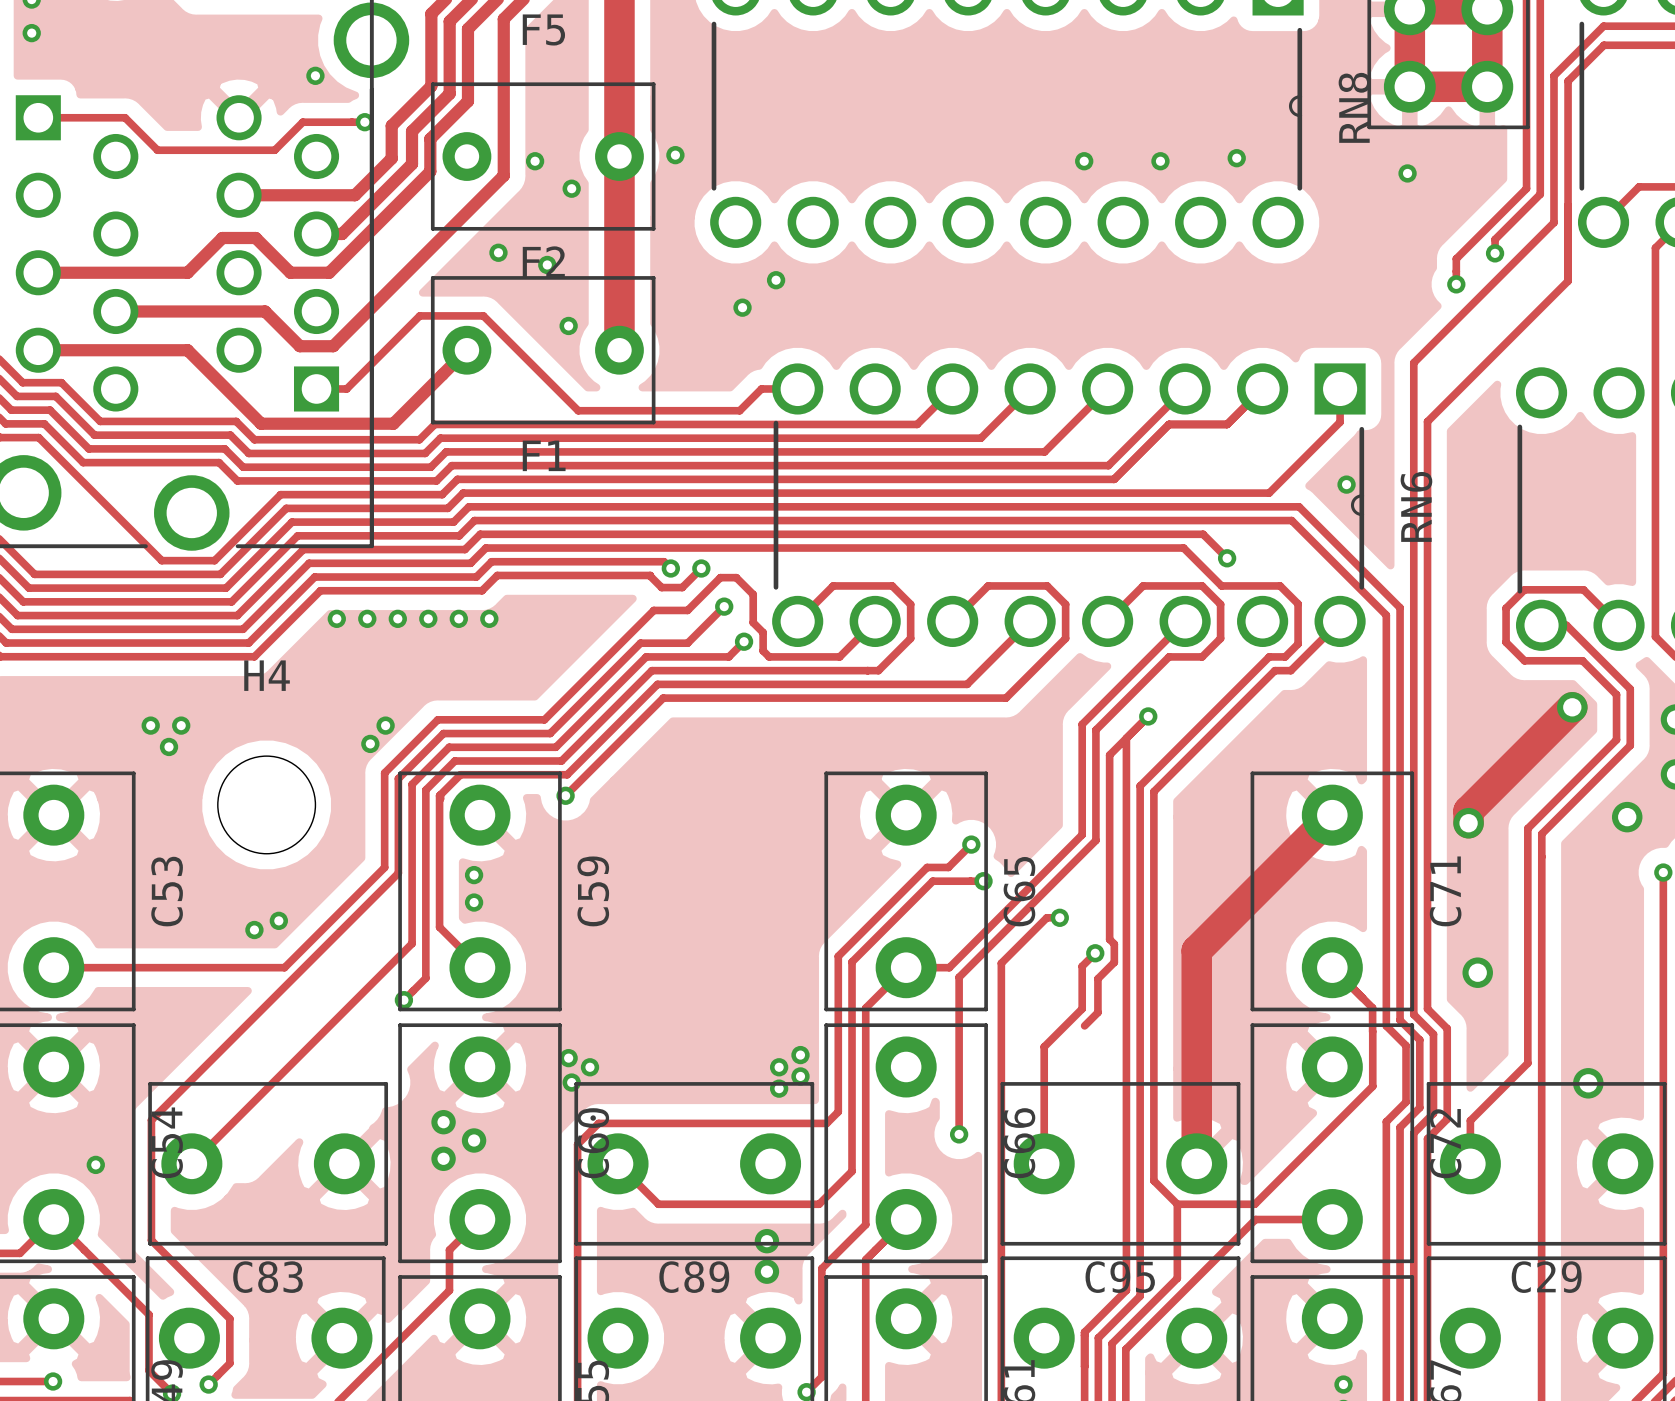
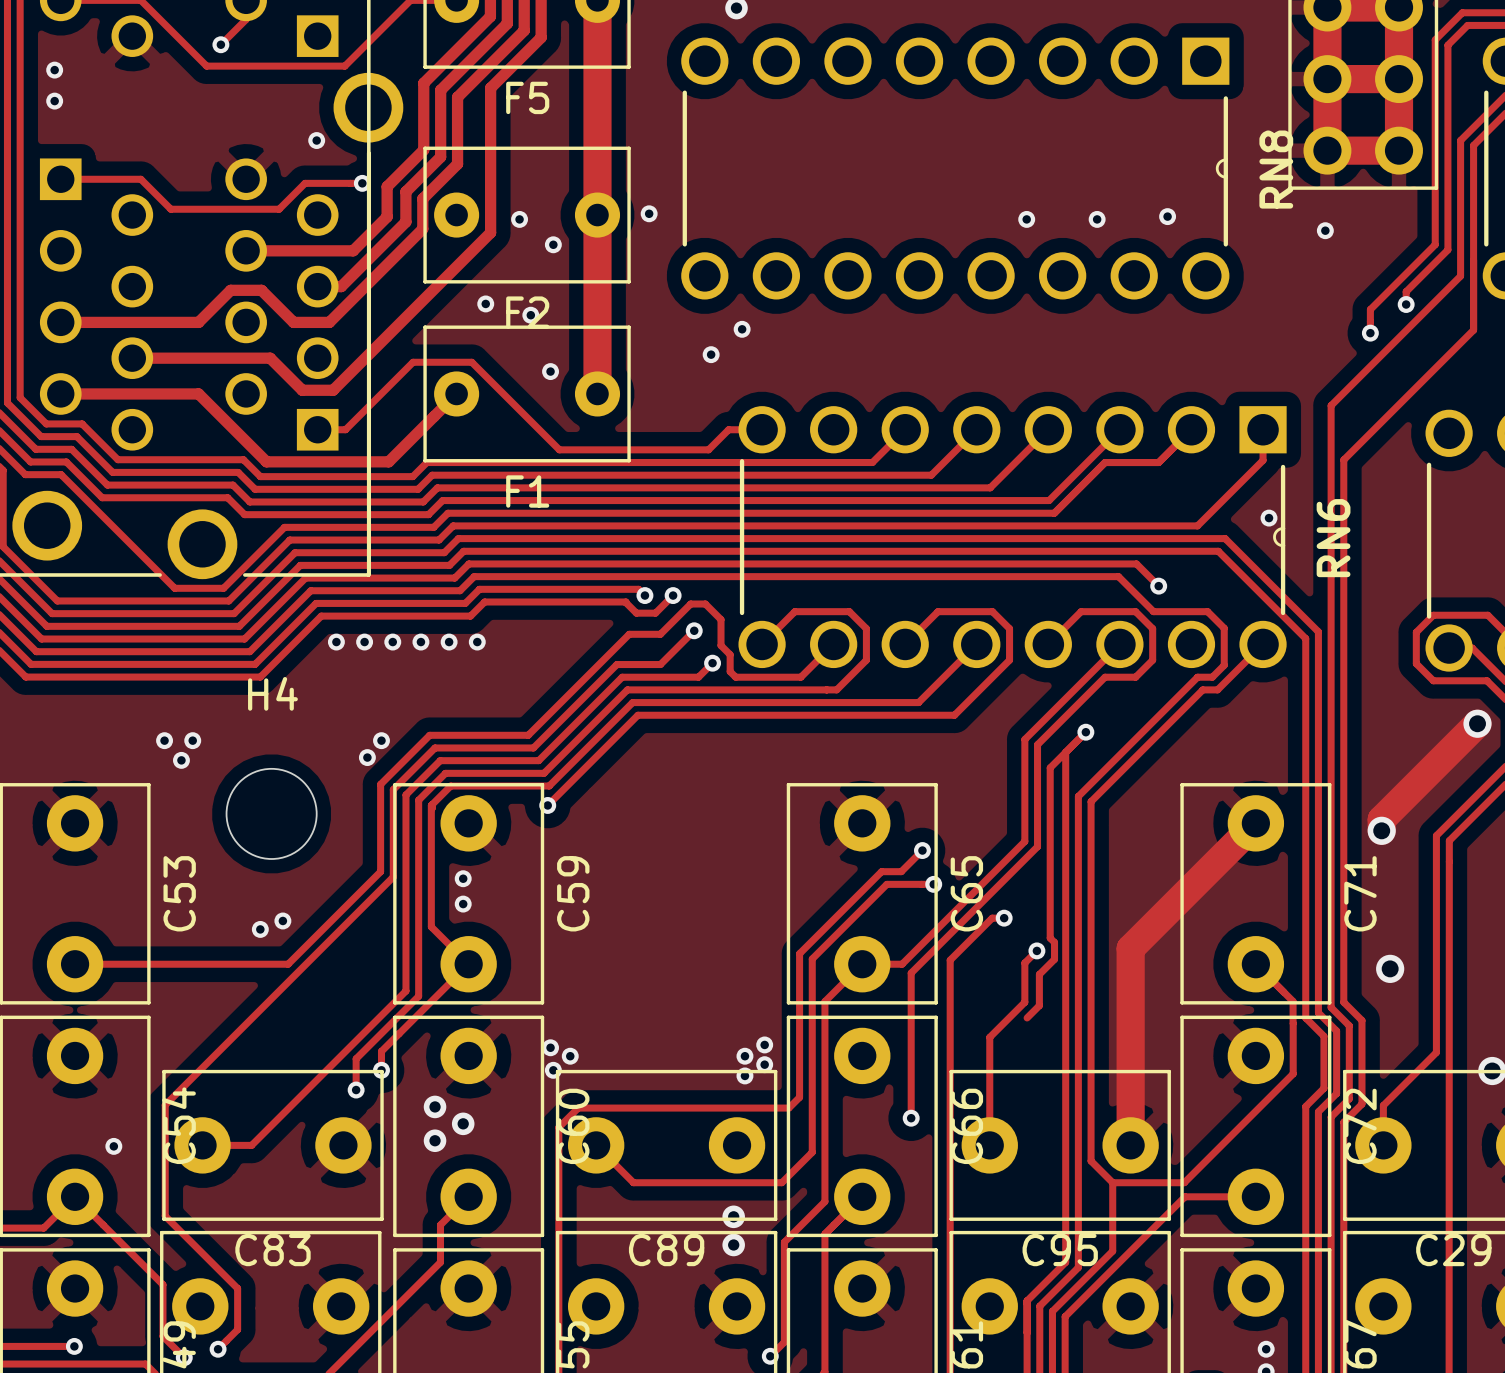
track: (412, 943) (191, 1163) -> (405, 941) (405, 991) (251, 1145) (202, 1145)
track: none -> (468, 964) (381, 1051) (381, 1070)
track: (425, 978) (403, 1000) -> (418, 973) (418, 996) (356, 1058) (356, 1090)
via: (403, 1000) -> none
via: none -> (381, 1070)
via: none -> (356, 1090)

